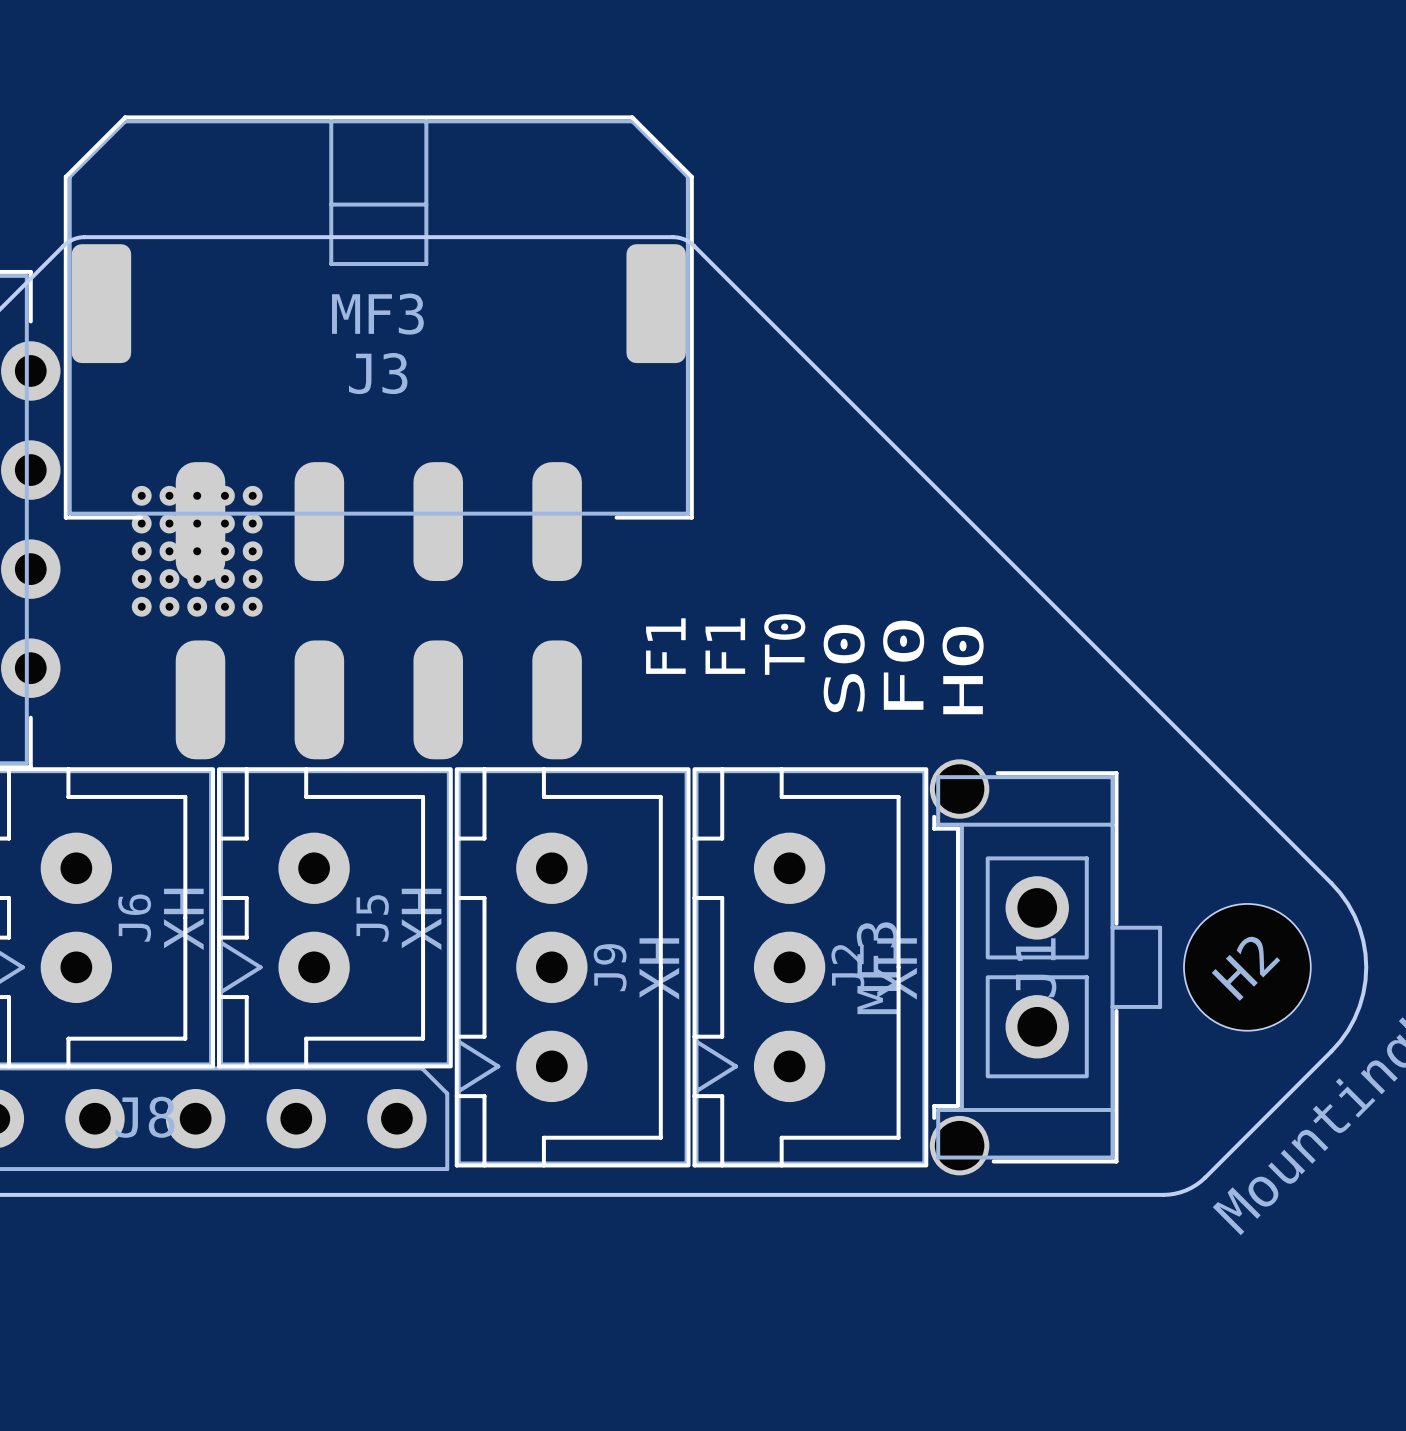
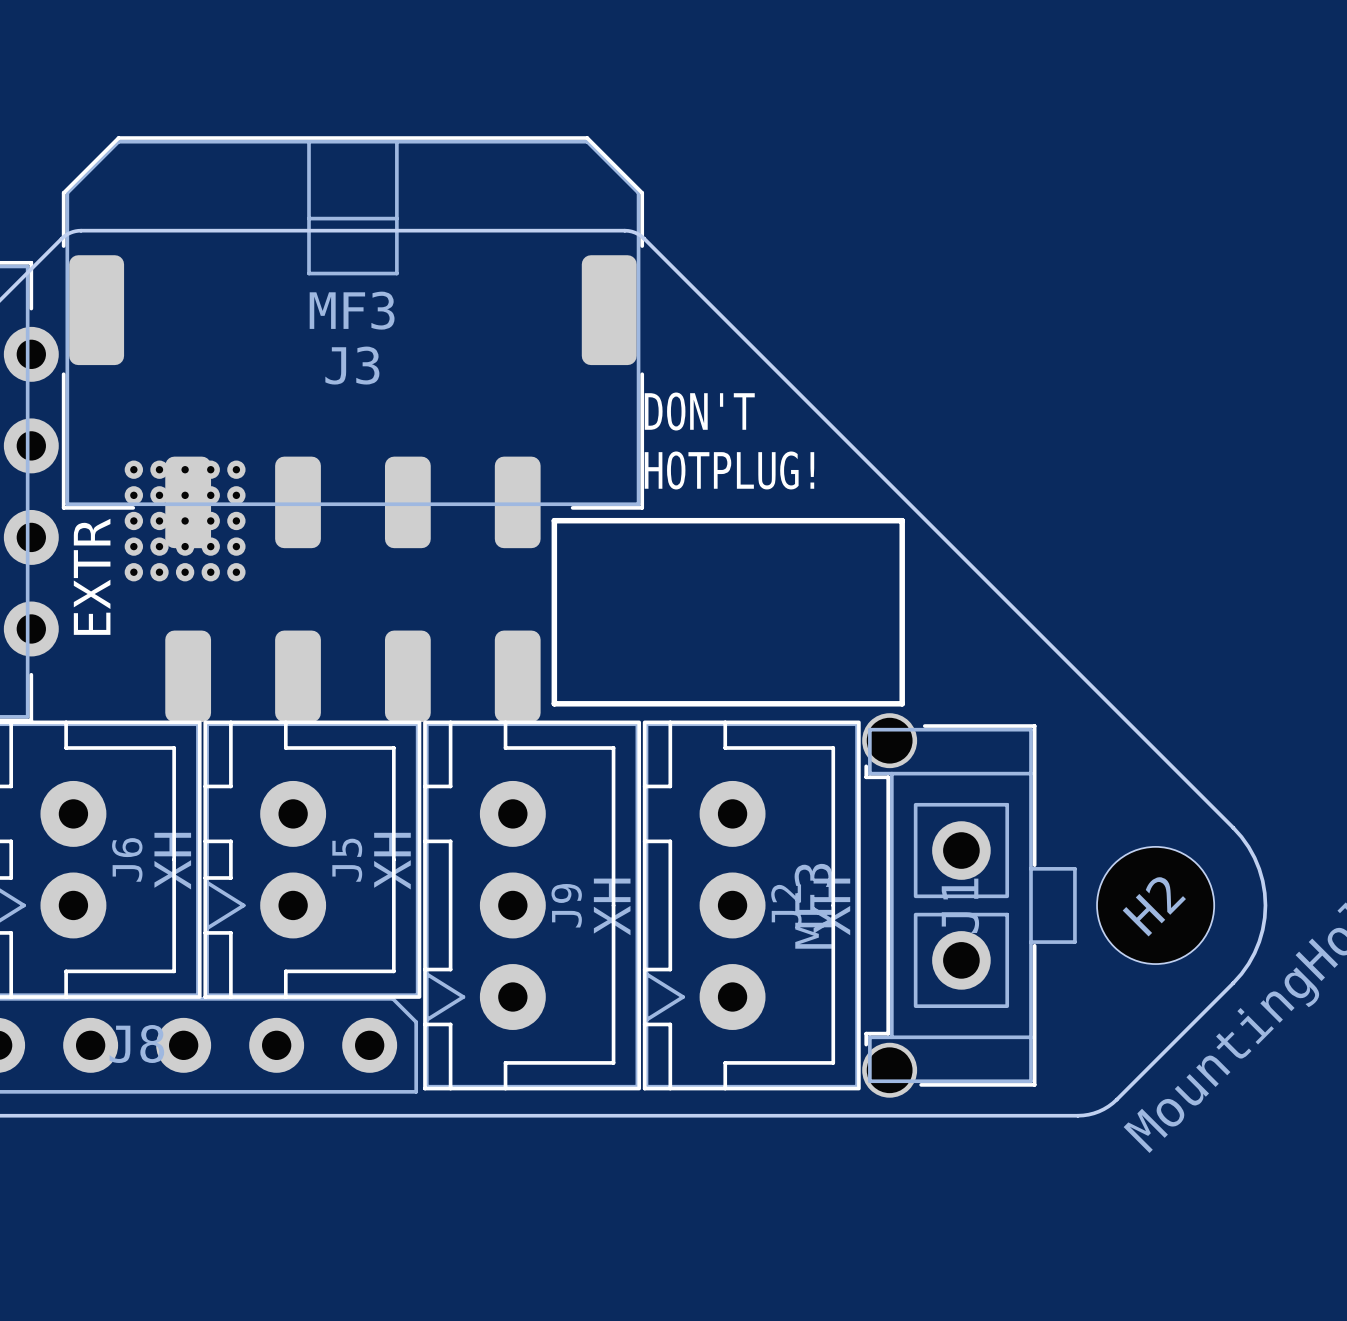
J3 footprint: [63, 115, 694, 760] -> [61, 136, 645, 723]
text: none -> DON'T (699, 411)
text: none -> HOTPLUG! (729, 470)
line: none -> (554, 520) (902, 520) (902, 703) (554, 703) (554, 520)
text: none -> EXTR (92, 576)
text: T0 (784, 644) -> none
text: F1 (665, 646) -> none
text: F1 (725, 646) -> none
text: F0 (903, 665) -> none
text: S0 (844, 668) -> none
text: H0 (963, 670) -> none

